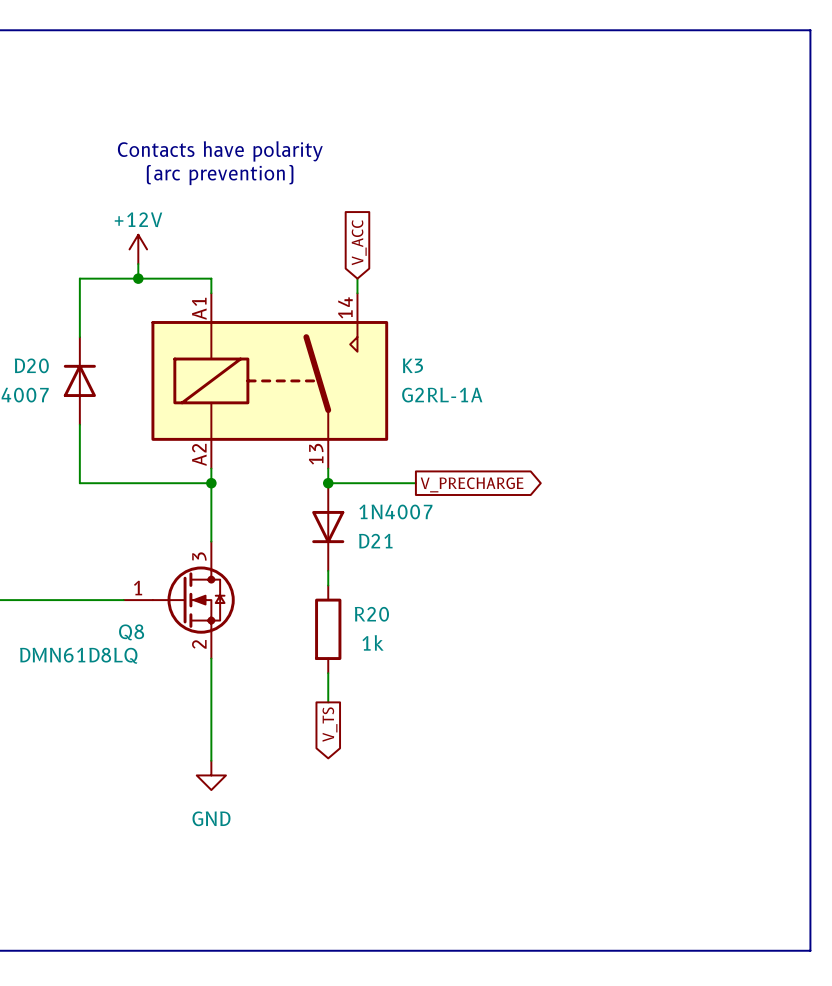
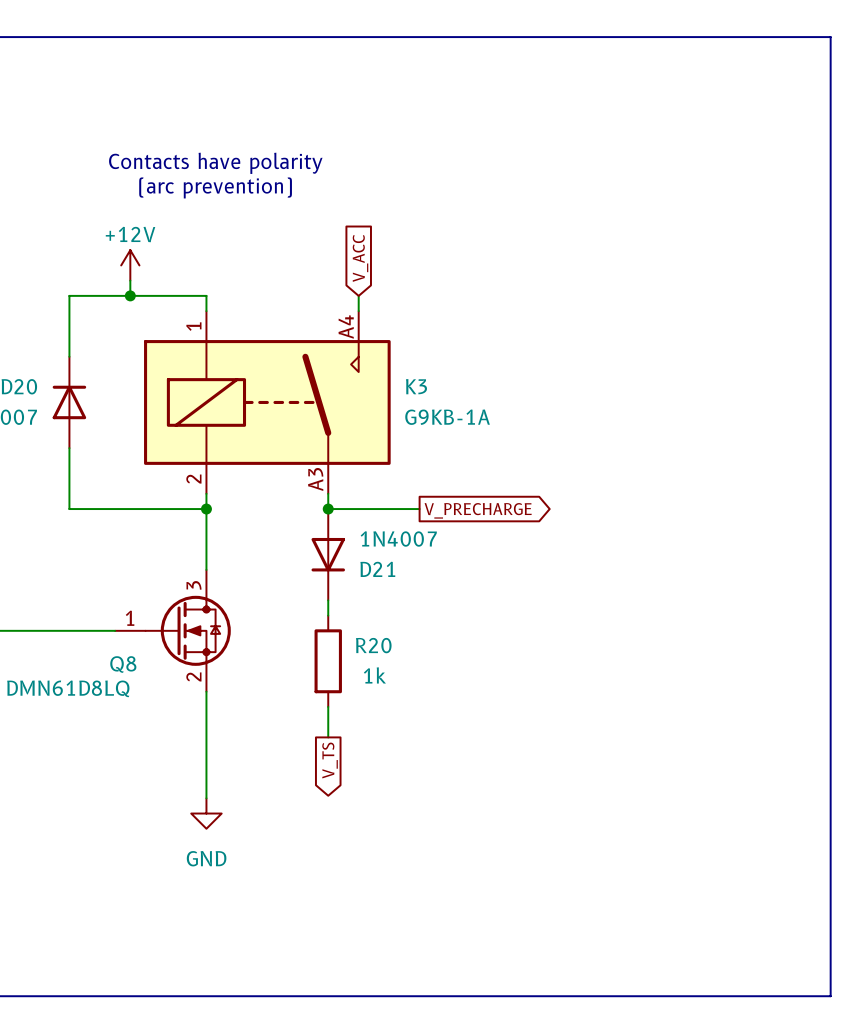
K3 pin number: 14 (345, 307) -> A4 (346, 327)
K3 pin number: A1 (199, 308) -> 1 (193, 326)
K3 value: G2RL-1A (442, 395) -> G9KB-1A (447, 417)
K3 pin number: A2 (199, 454) -> 2 (193, 479)
K3 pin number: 13 (316, 454) -> A3 (315, 479)

